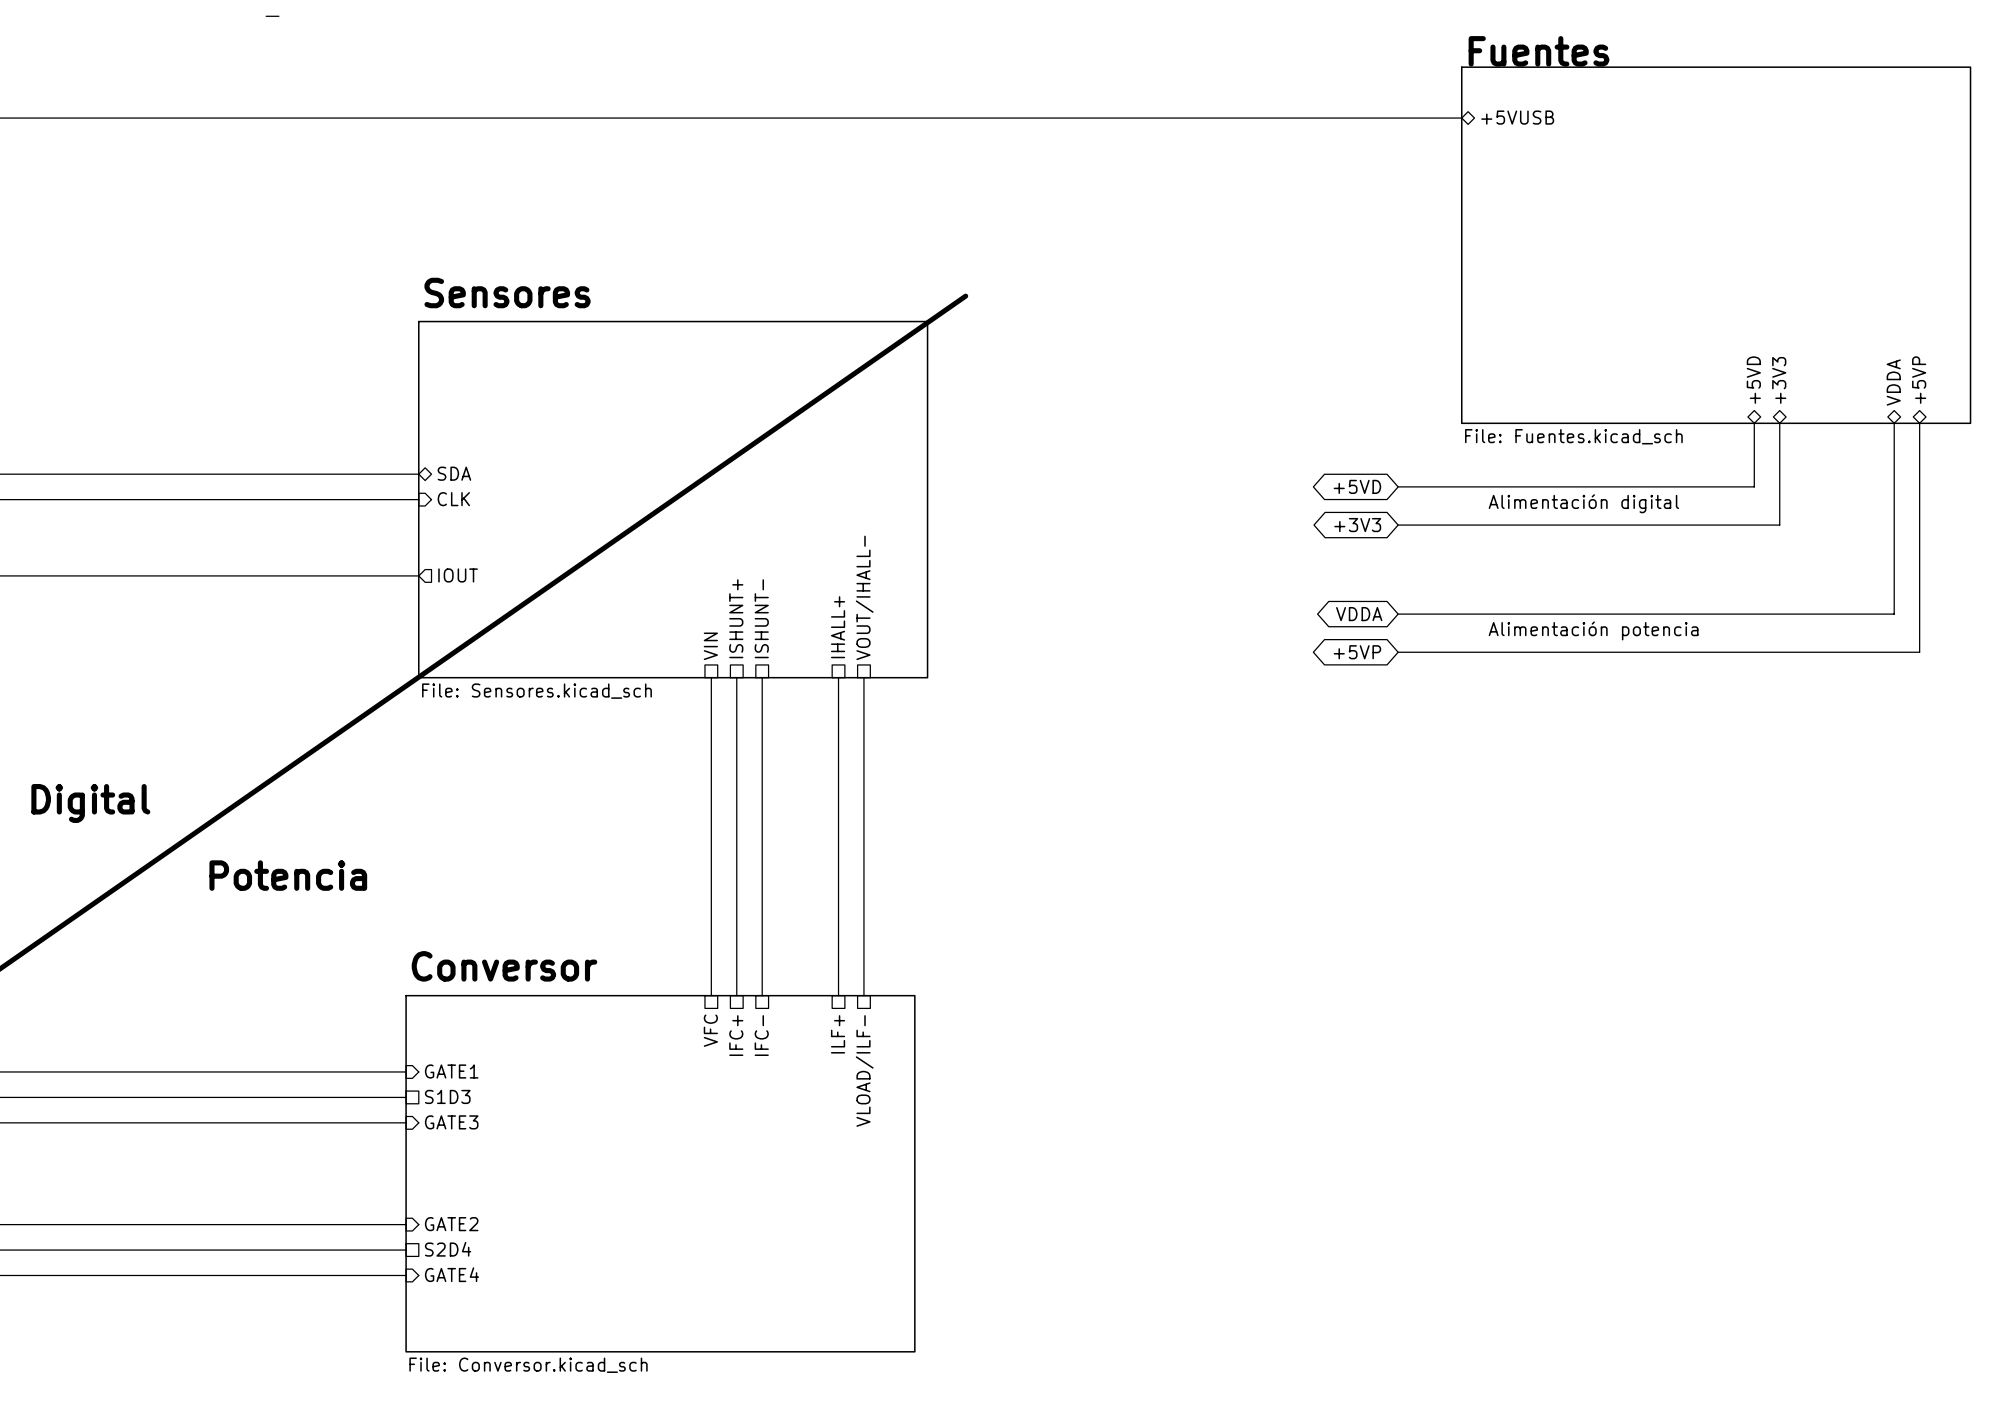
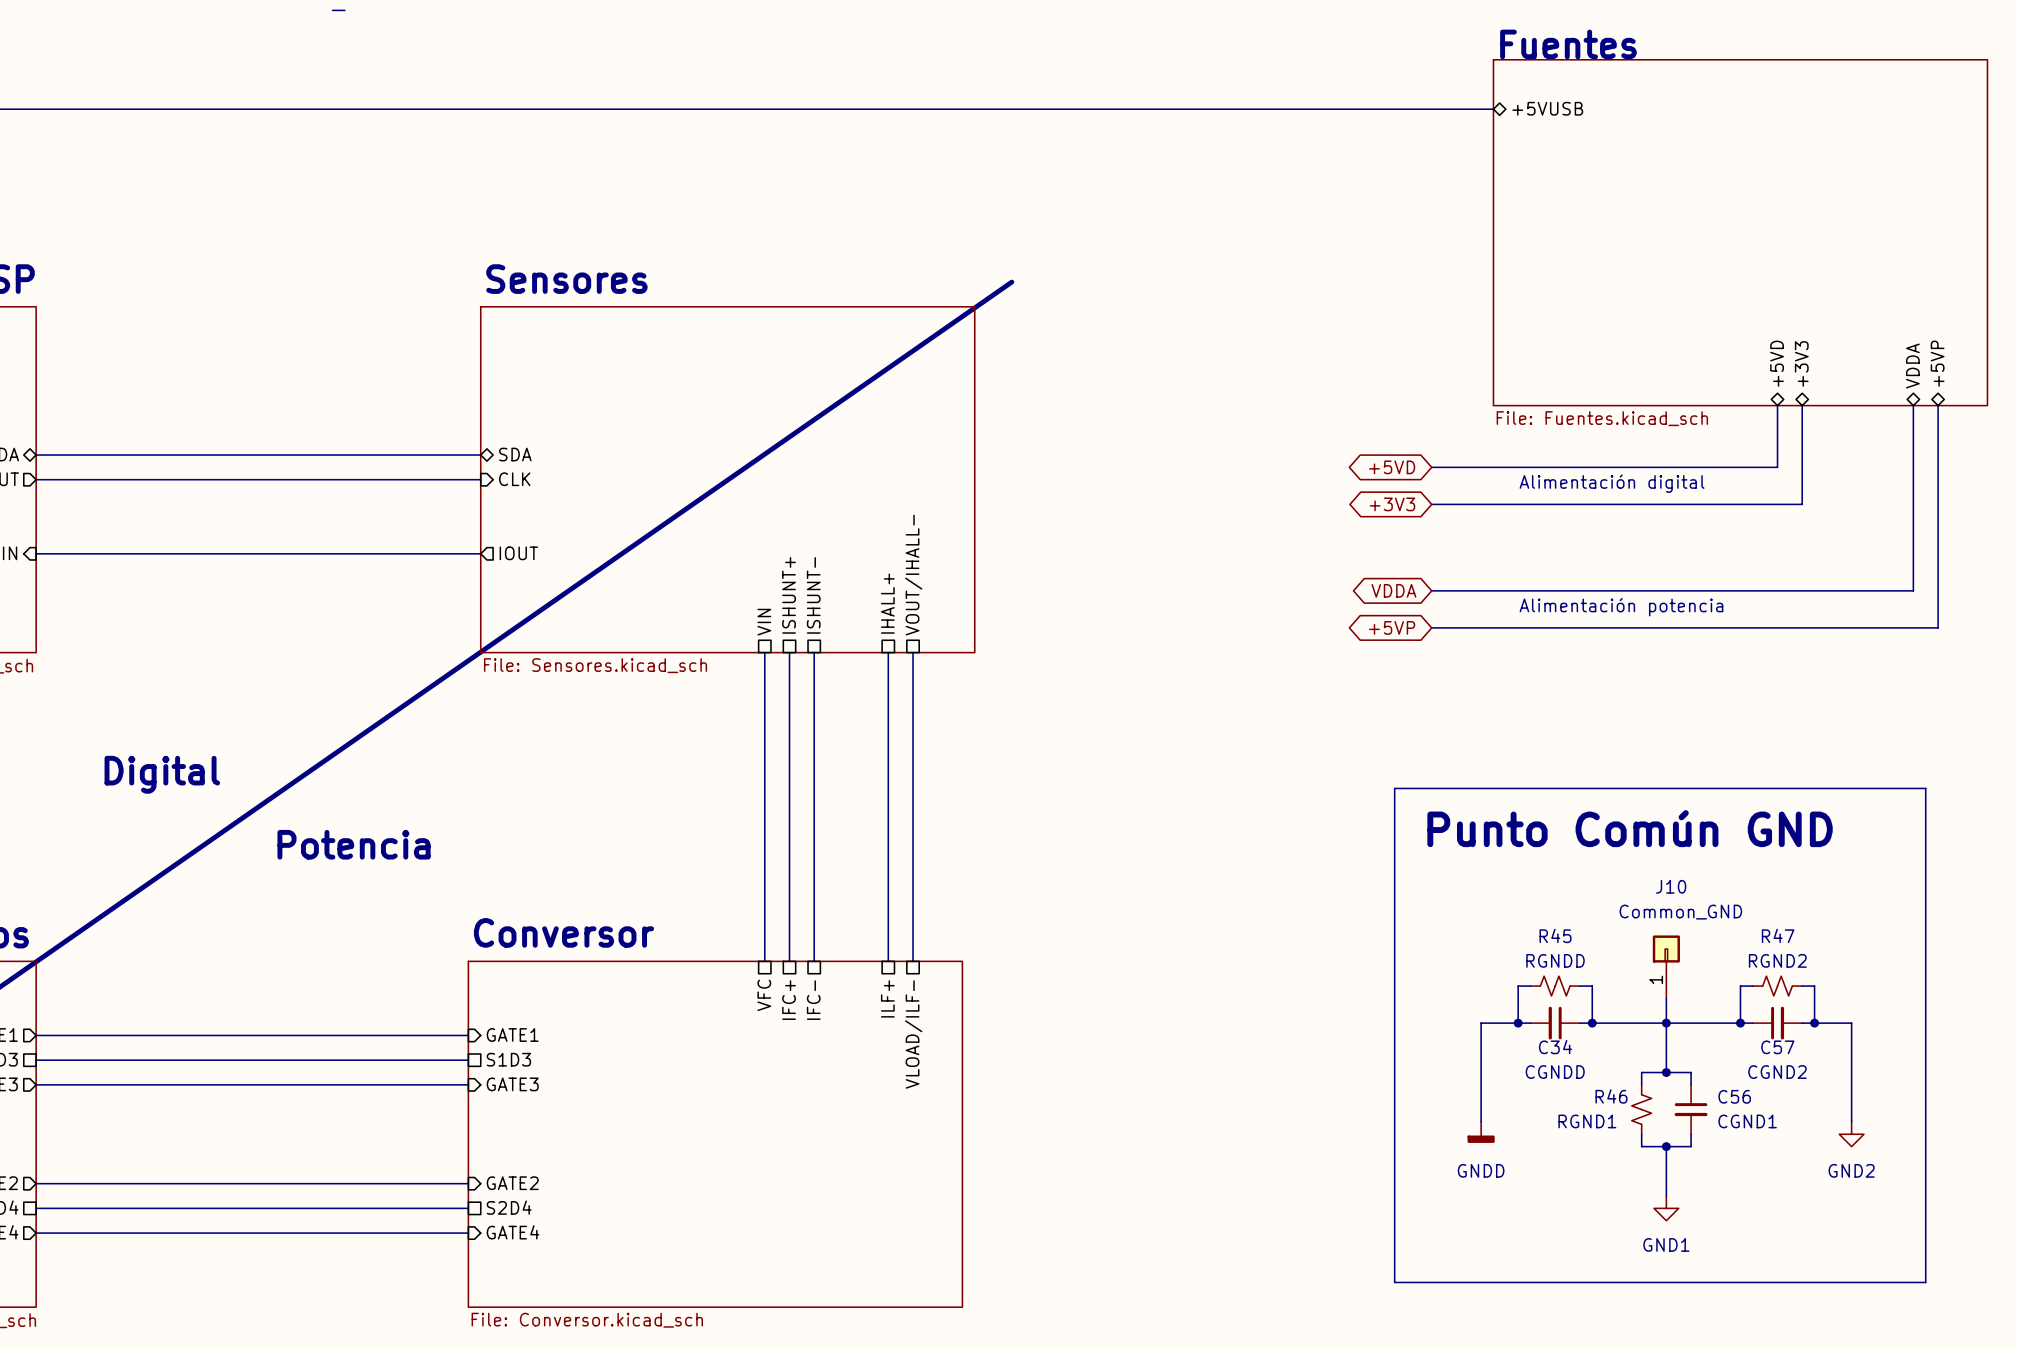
line: none -> (1394, 788) (1925, 788) (1925, 1282) (1394, 1282) (1394, 788)
text: none -> Punto Común GND (1630, 828)
J10: none -> Common_GND (1666, 966)
wire: none -> (1530, 986) (1518, 986) (1518, 1023)
R45: none -> RGNDD (1555, 986)
wire: none -> (1579, 986) (1592, 986) (1592, 1023)
wire: none -> (1752, 986) (1740, 986) (1740, 1023)
R47: none -> RGND2 (1777, 986)
wire: none -> (1802, 986) (1814, 986) (1814, 1023)
wire: none -> (1666, 998) (1666, 1072)
junction: none -> (1518, 1023)
wire: none -> (1530, 1023) (1481, 1023) (1481, 1121)
C34: none -> CGNDD (1555, 1023)
wire: none -> (1579, 1023) (1752, 1023)
junction: none -> (1592, 1023)
junction: none -> (1666, 1023)
junction: none -> (1740, 1023)
C57: none -> CGND2 (1777, 1023)
wire: none -> (1802, 1023) (1851, 1023) (1851, 1121)
junction: none -> (1814, 1023)
junction: none -> (1666, 1072)
wire: none -> (1641, 1084) (1641, 1072) (1691, 1072) (1691, 1084)
R46: none -> RGND1 (1641, 1109)
C56: none -> CGND1 (1691, 1109)
power symbol: none -> GNDD (1481, 1132)
wire: none -> (1641, 1134) (1641, 1146) (1691, 1146) (1691, 1134)
power symbol: none -> GND2 (1851, 1134)
wire: none -> (1666, 1146) (1666, 1196)
junction: none -> (1666, 1146)
power symbol: none -> GND1 (1666, 1208)

